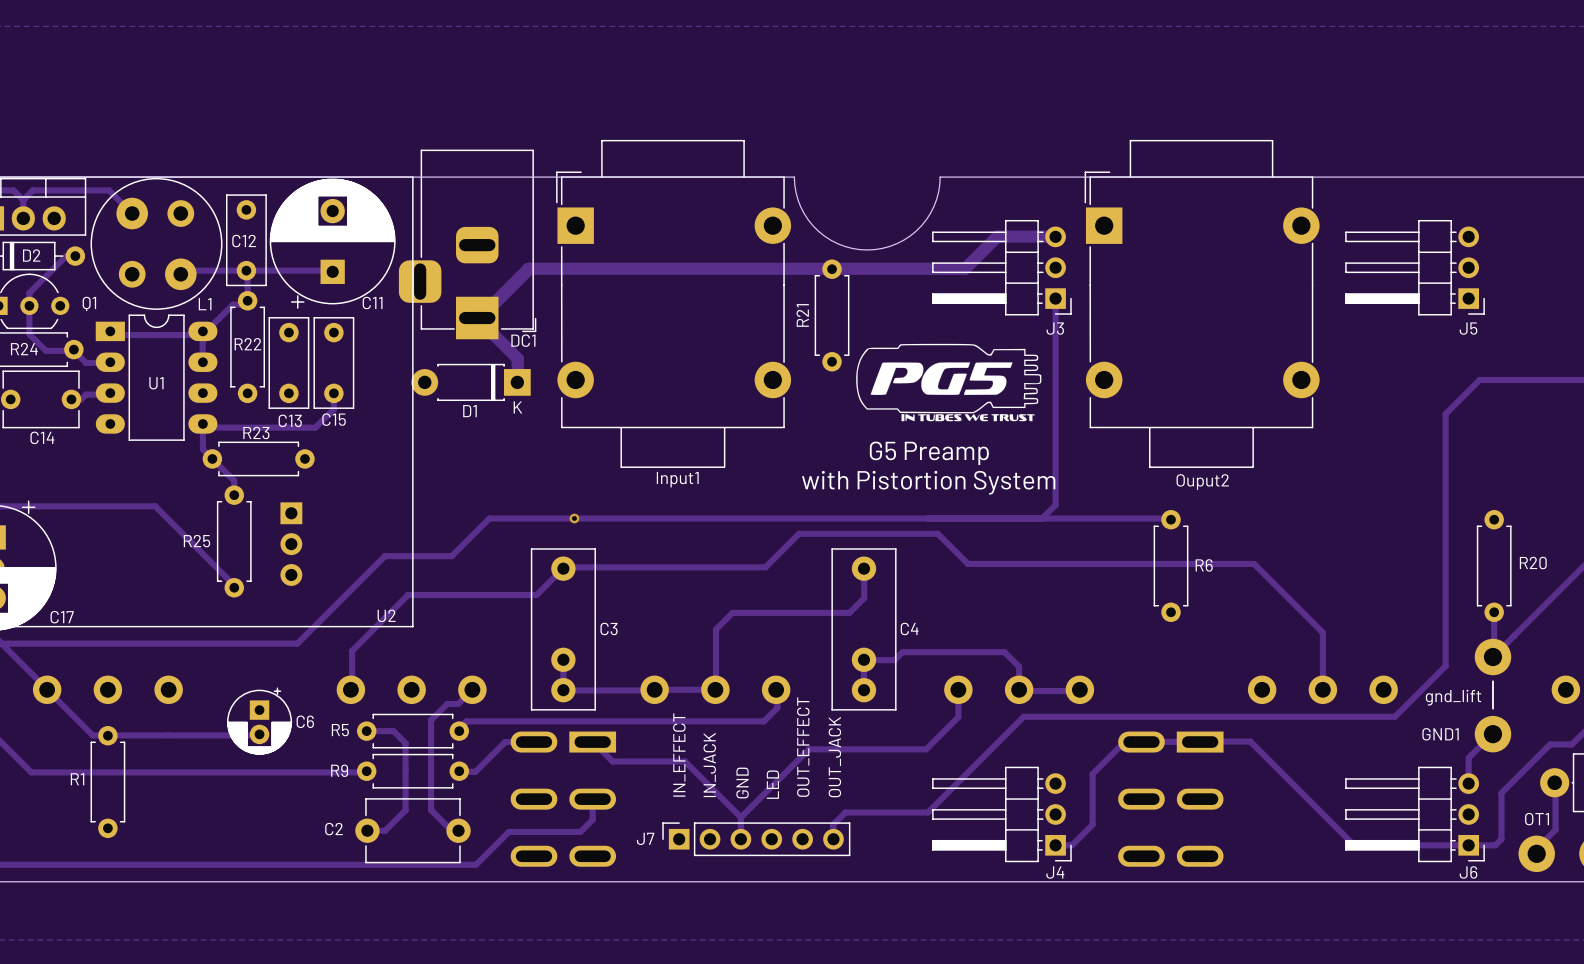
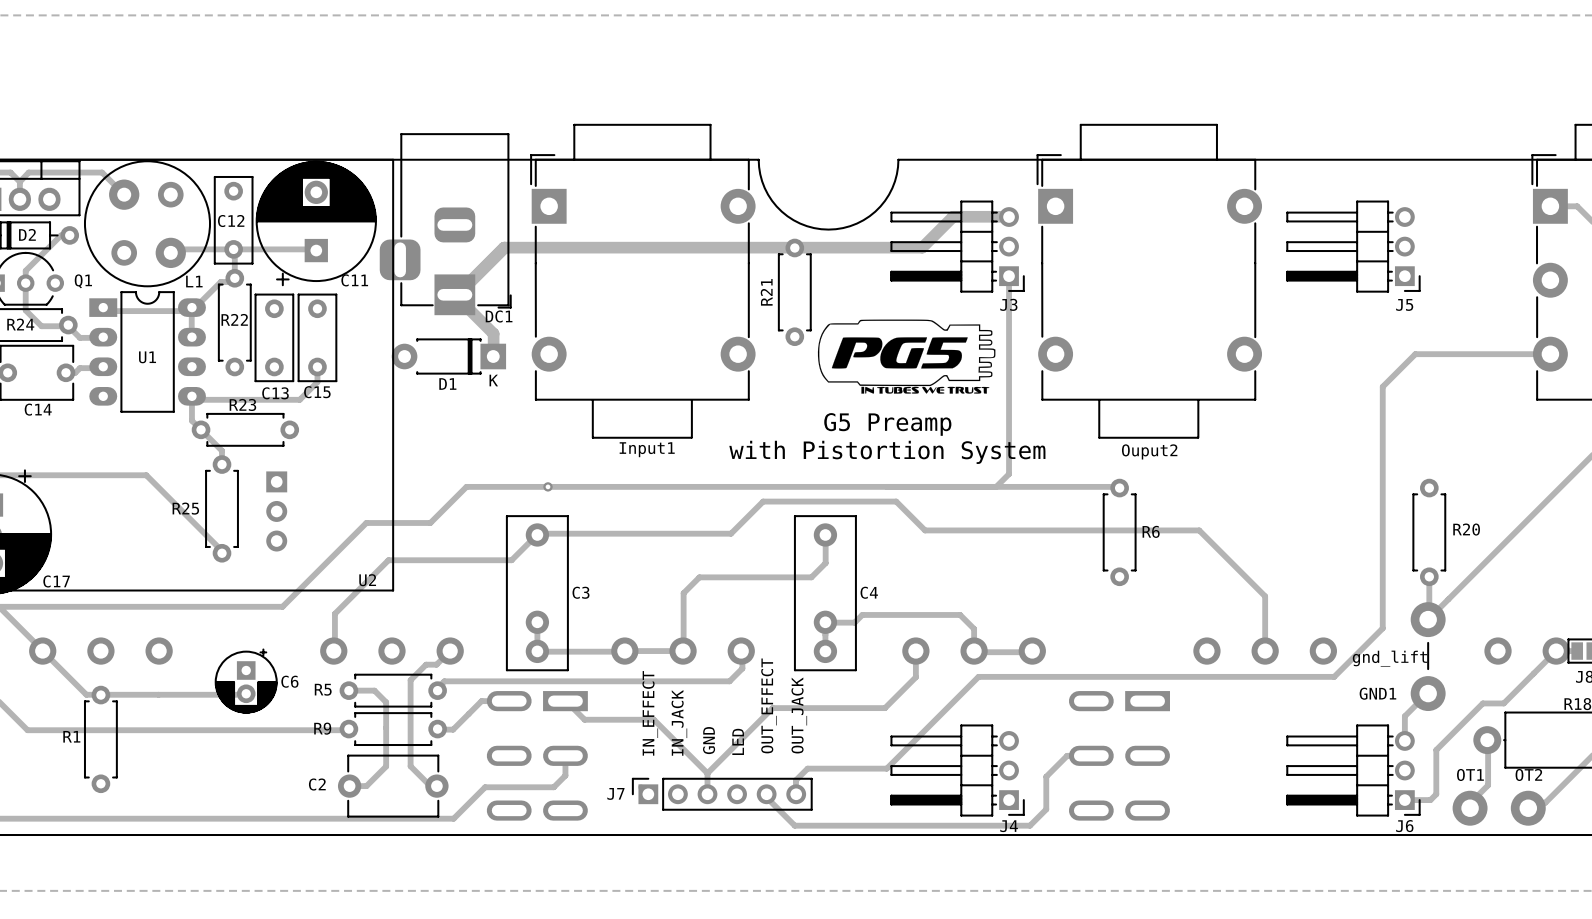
track: (1200, 741) (1124, 741) (1092, 774) (1092, 824) (1071, 845) (1055, 845) -> none
track: (1205, 741) (1250, 741) (1354, 845) (1468, 845) -> none
track: none -> (1082, 755) (1067, 755) (1046, 776) (1046, 809) (1029, 825) (794, 825) (763, 794)

